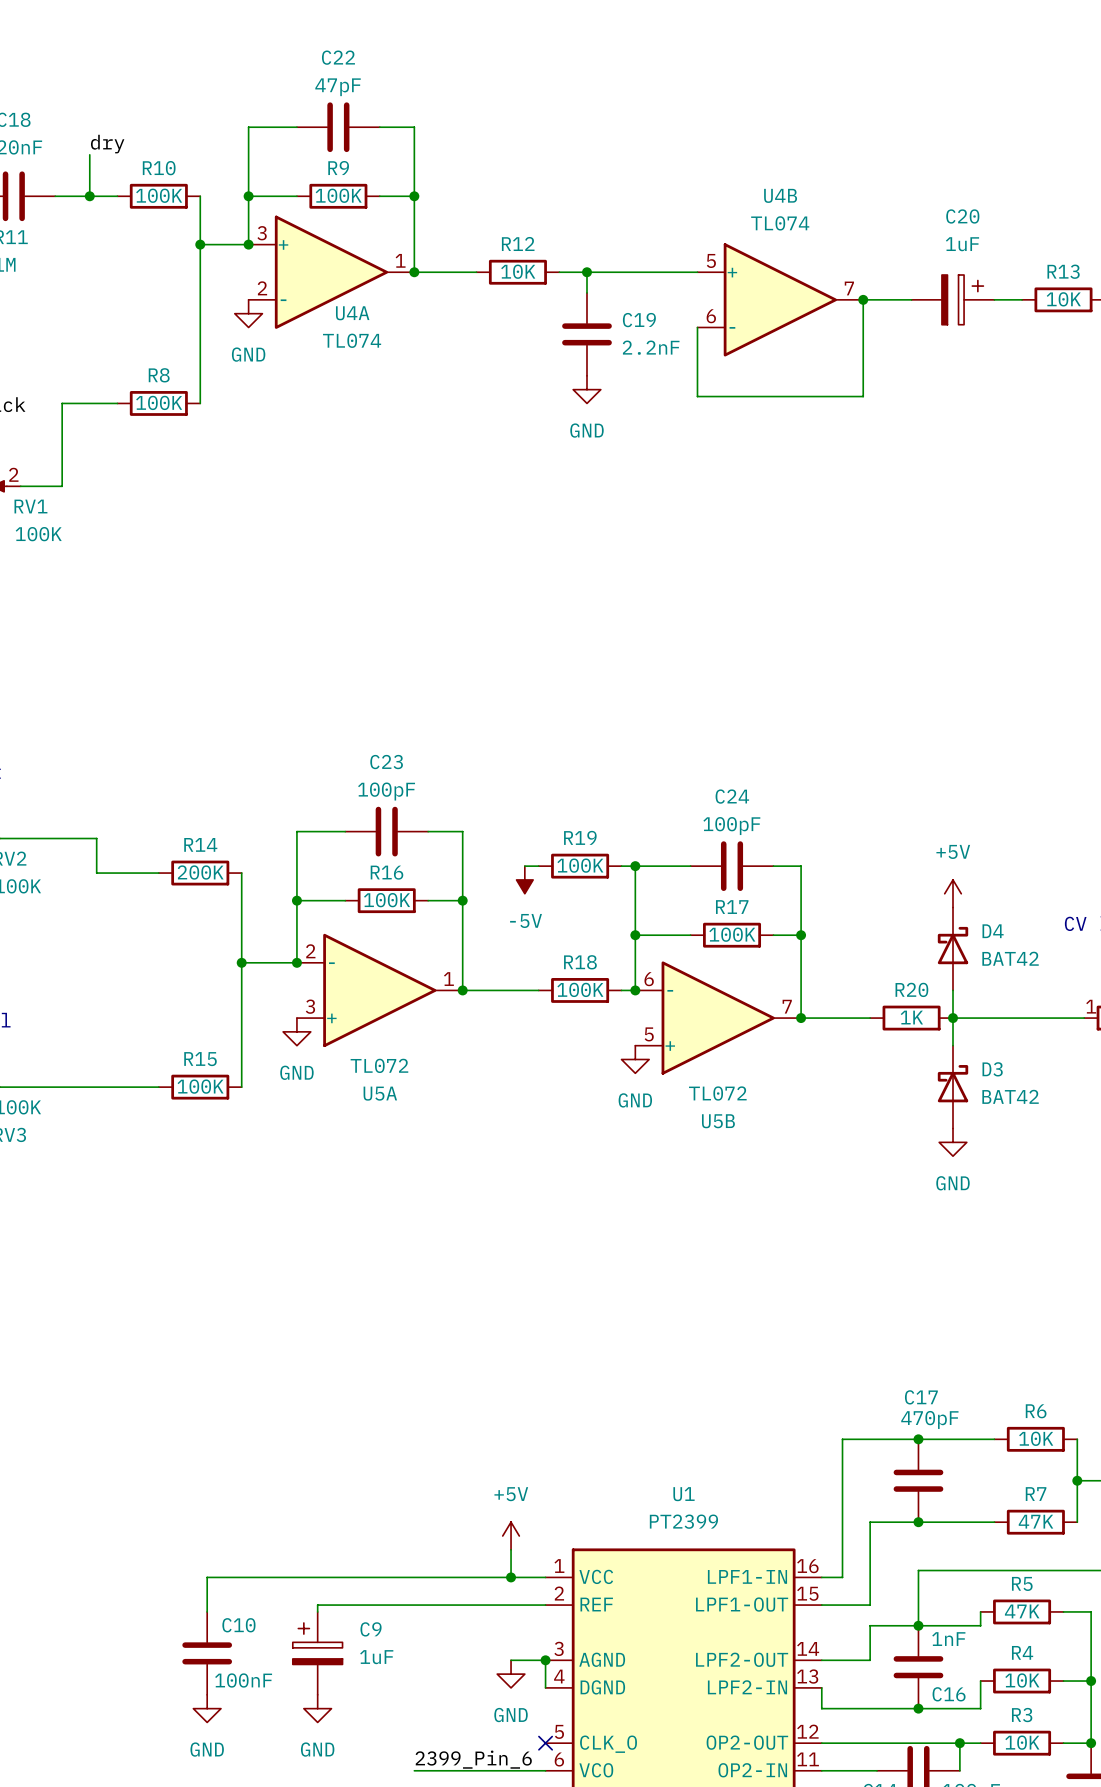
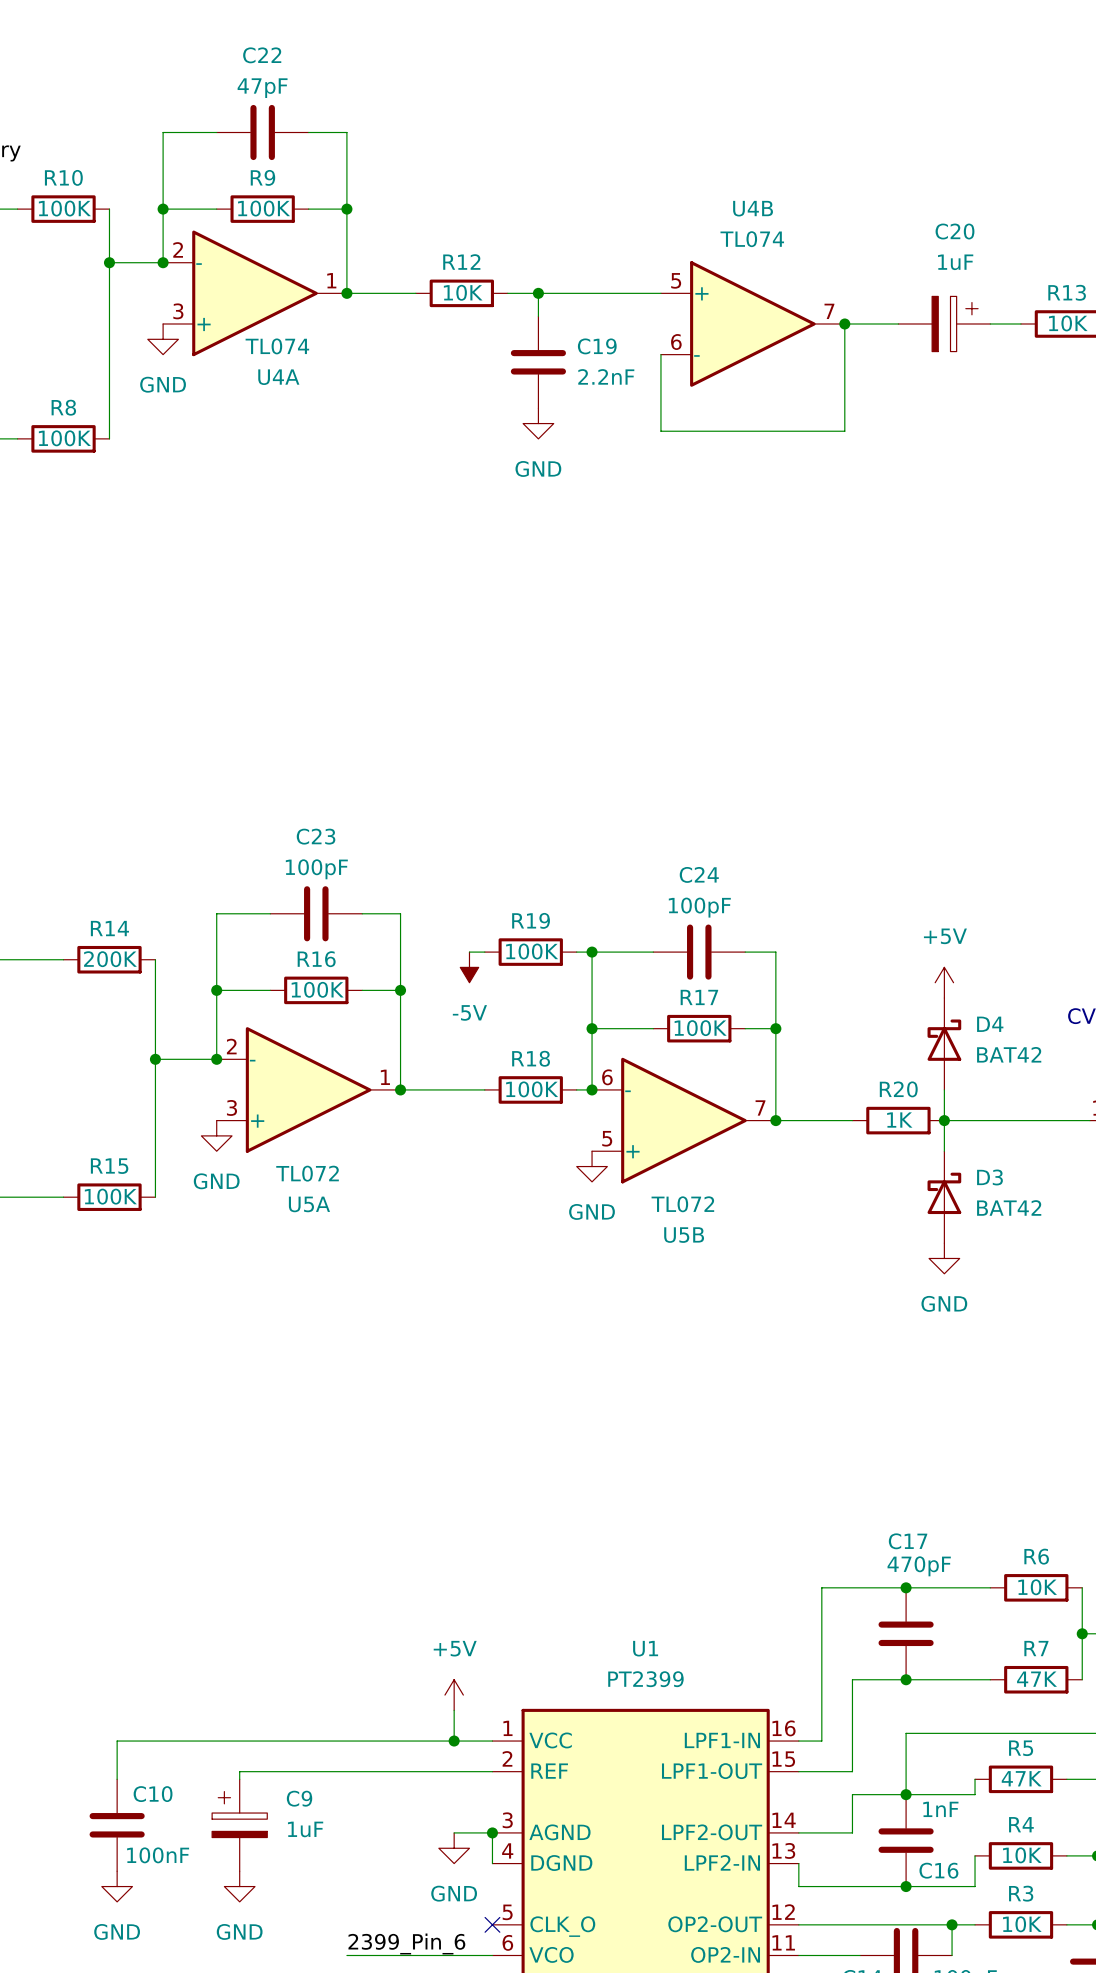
U4A flip: as is (331, 272) -> up-down (255, 293)
U4A name position: U4A (352, 313) -> U4A (278, 377)

